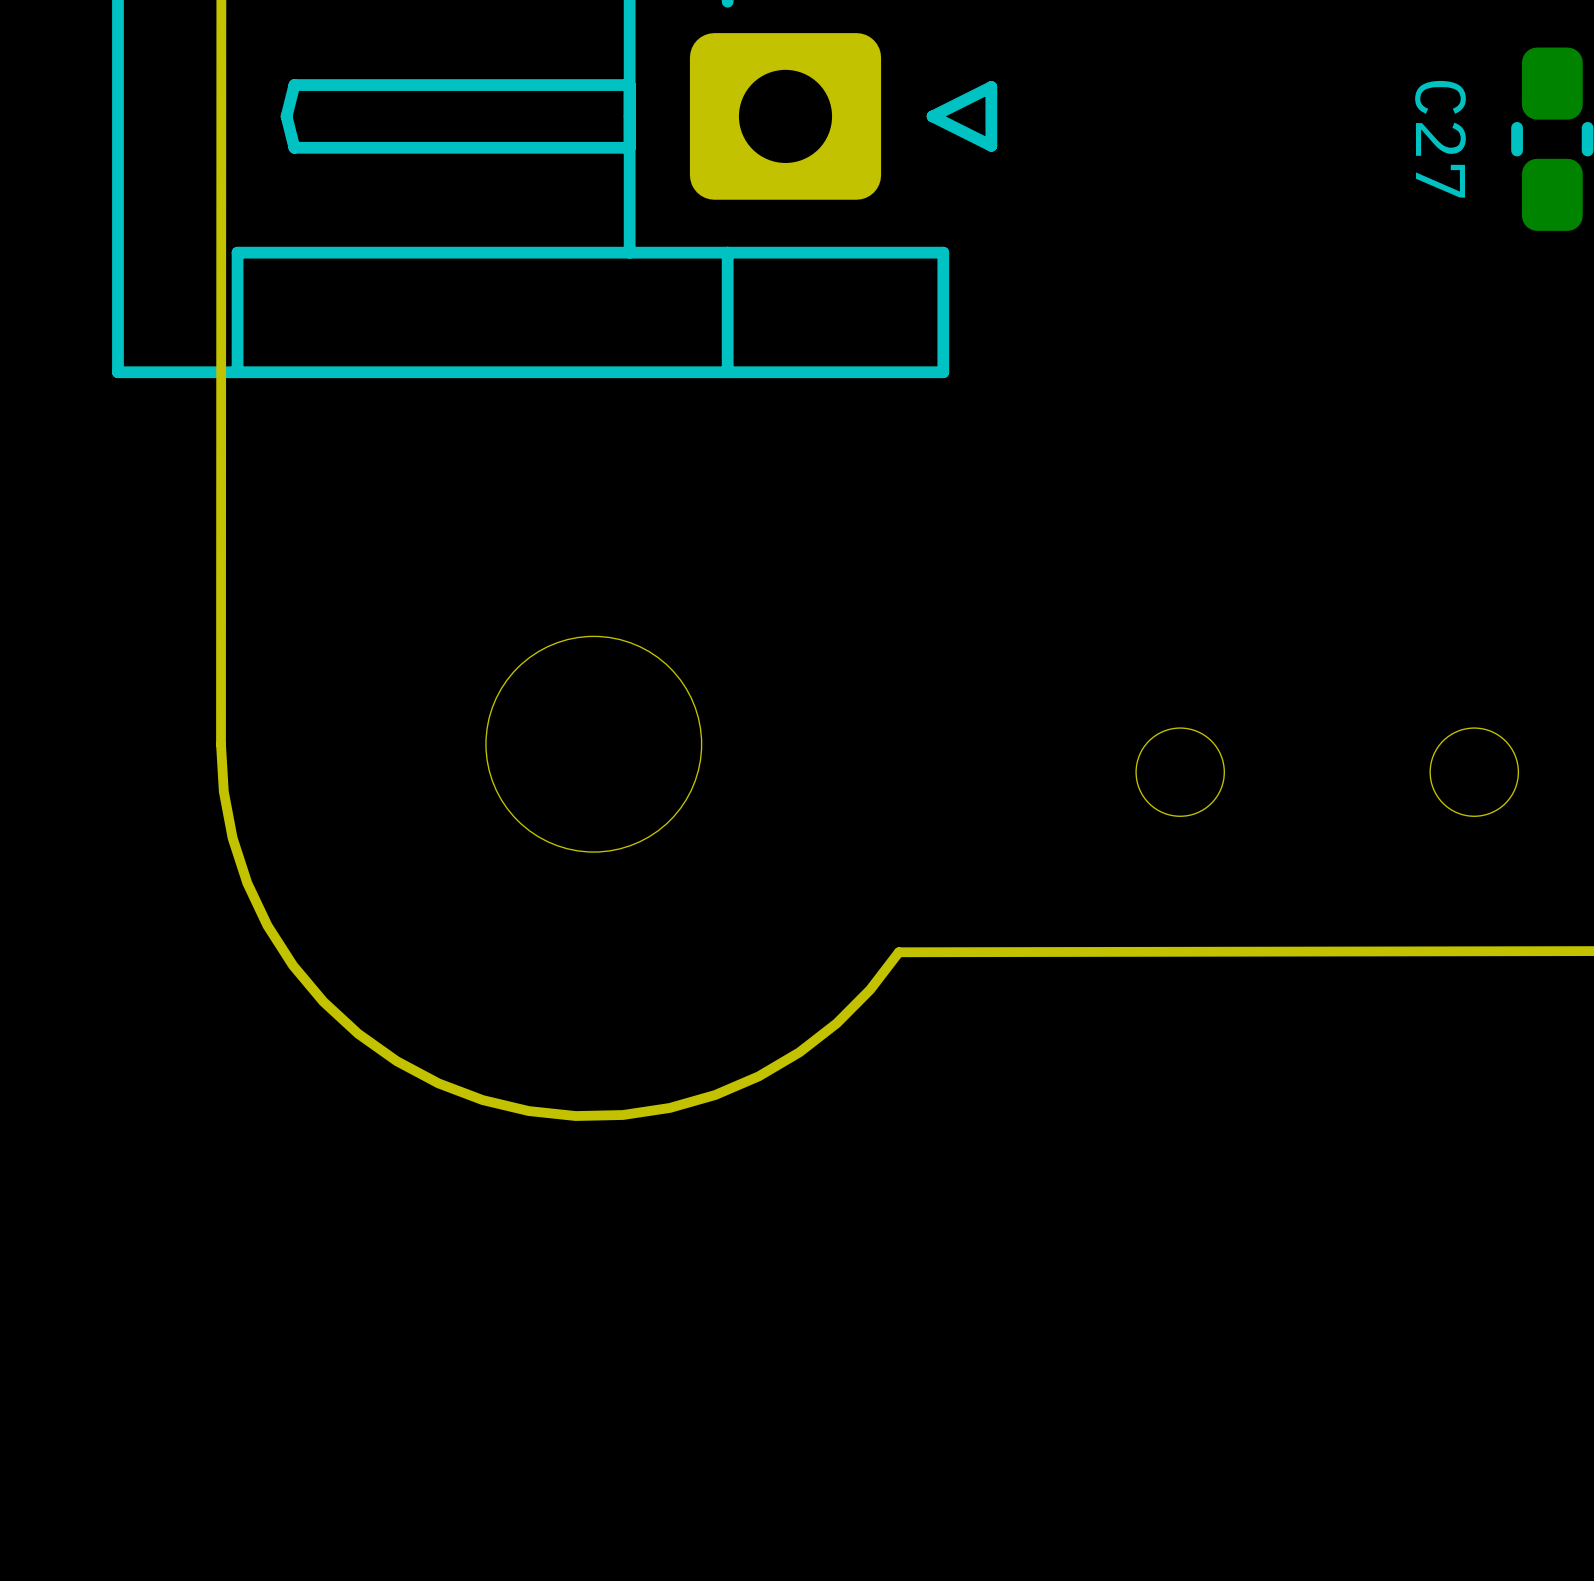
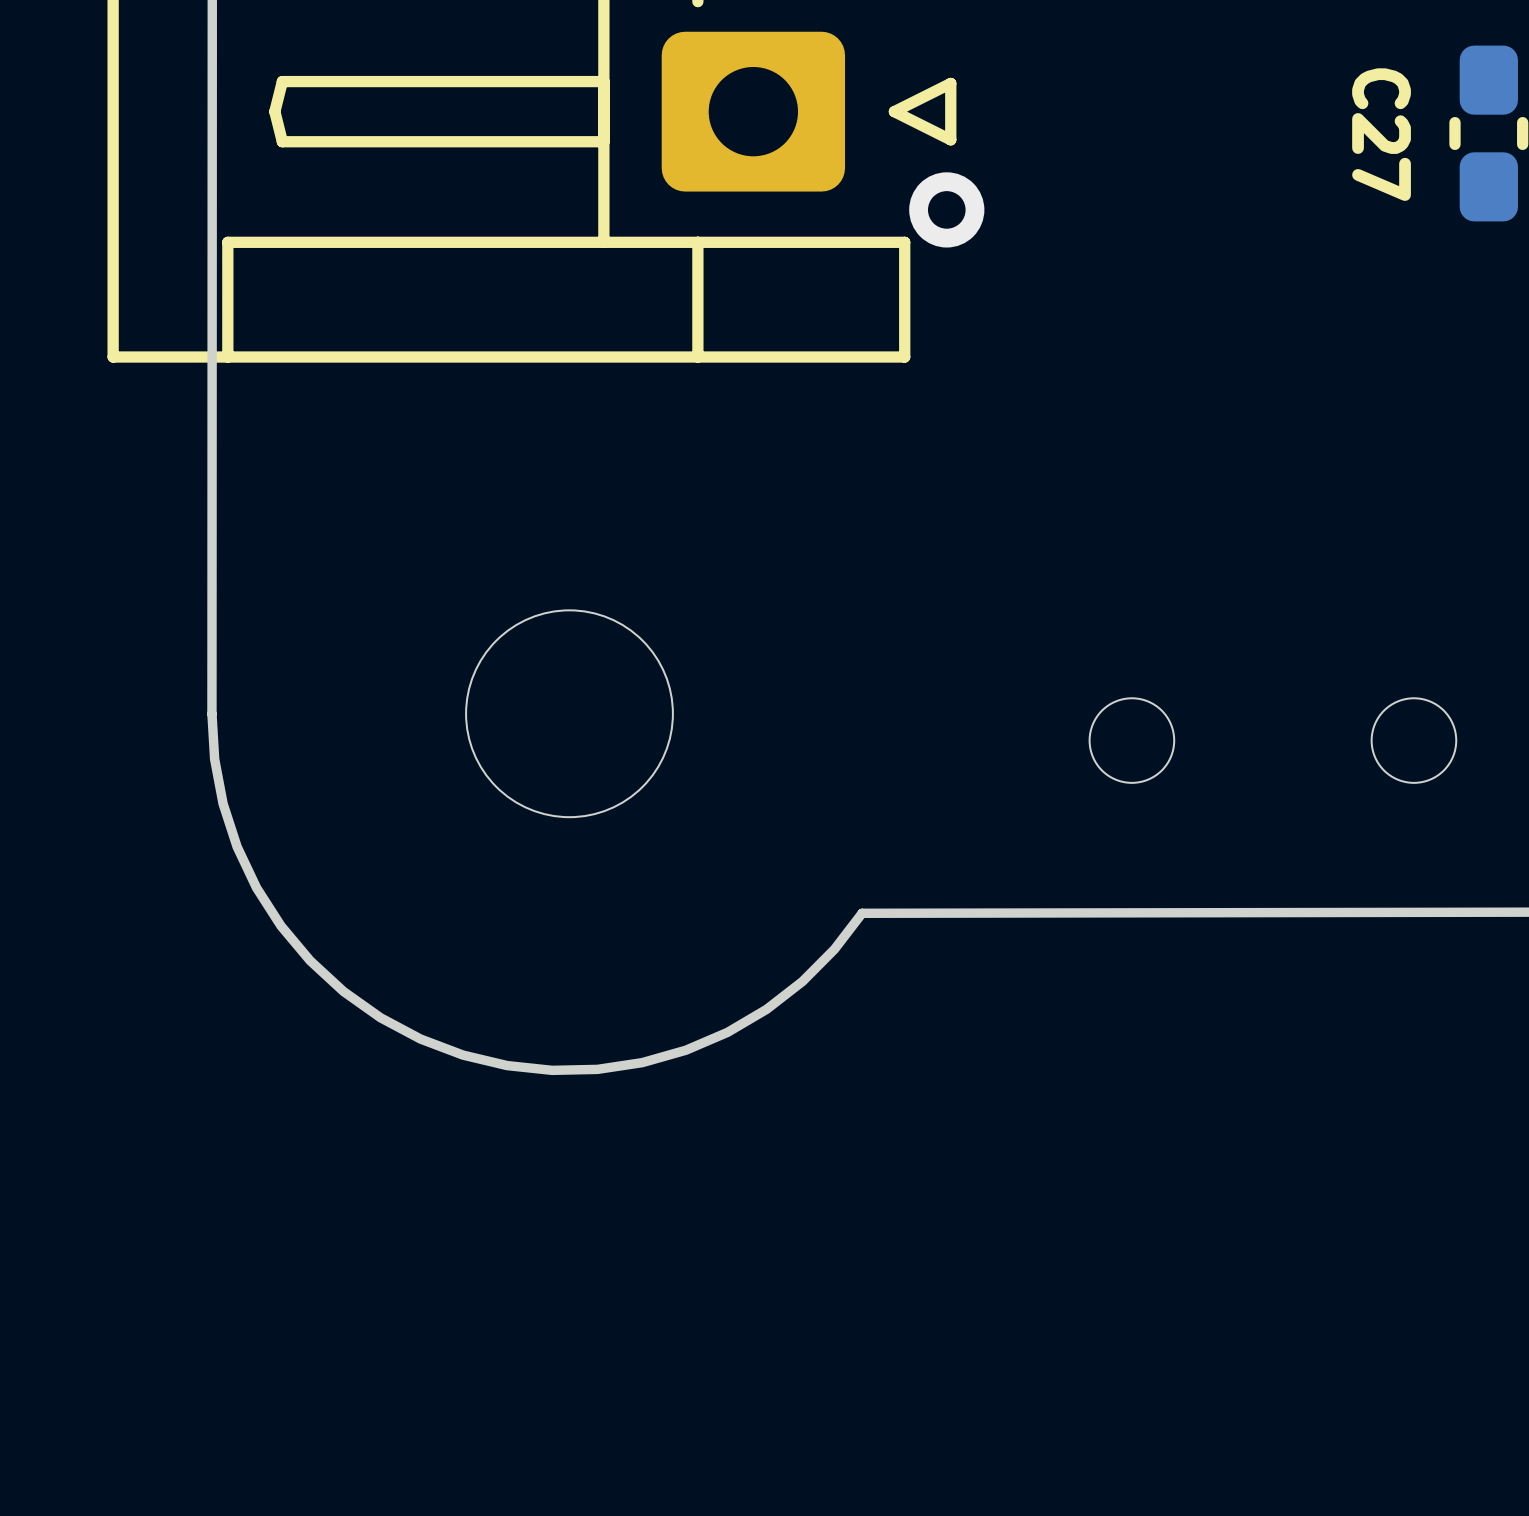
via: none -> (946, 209)

